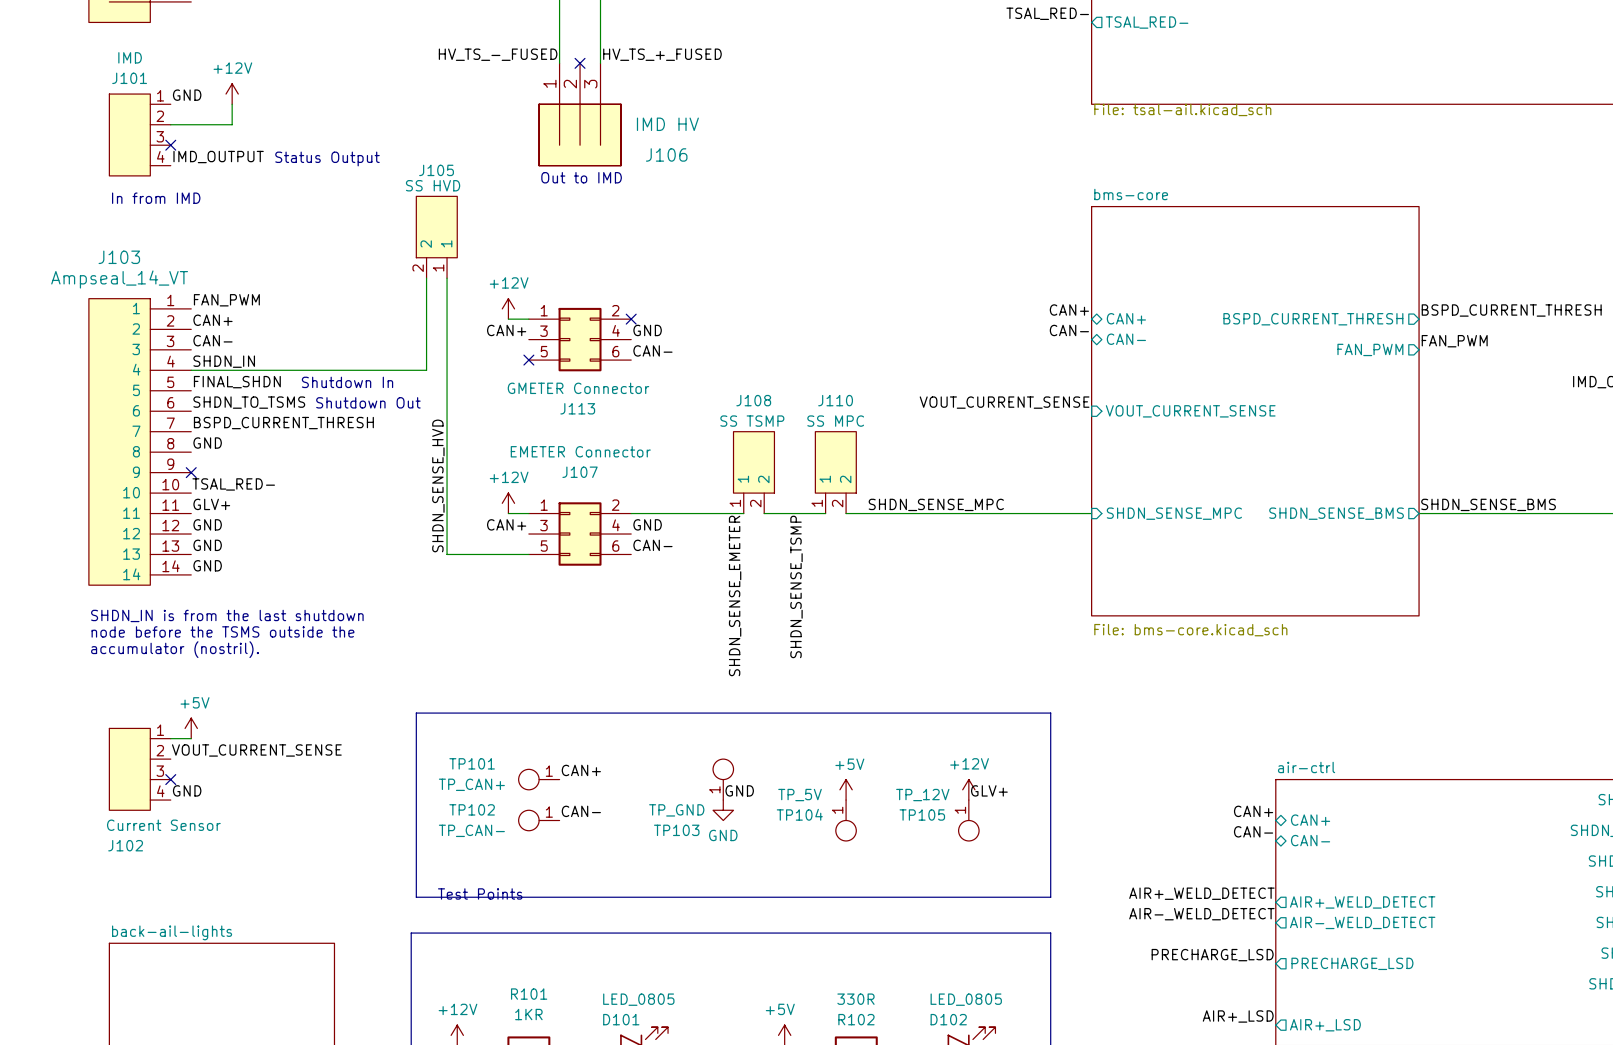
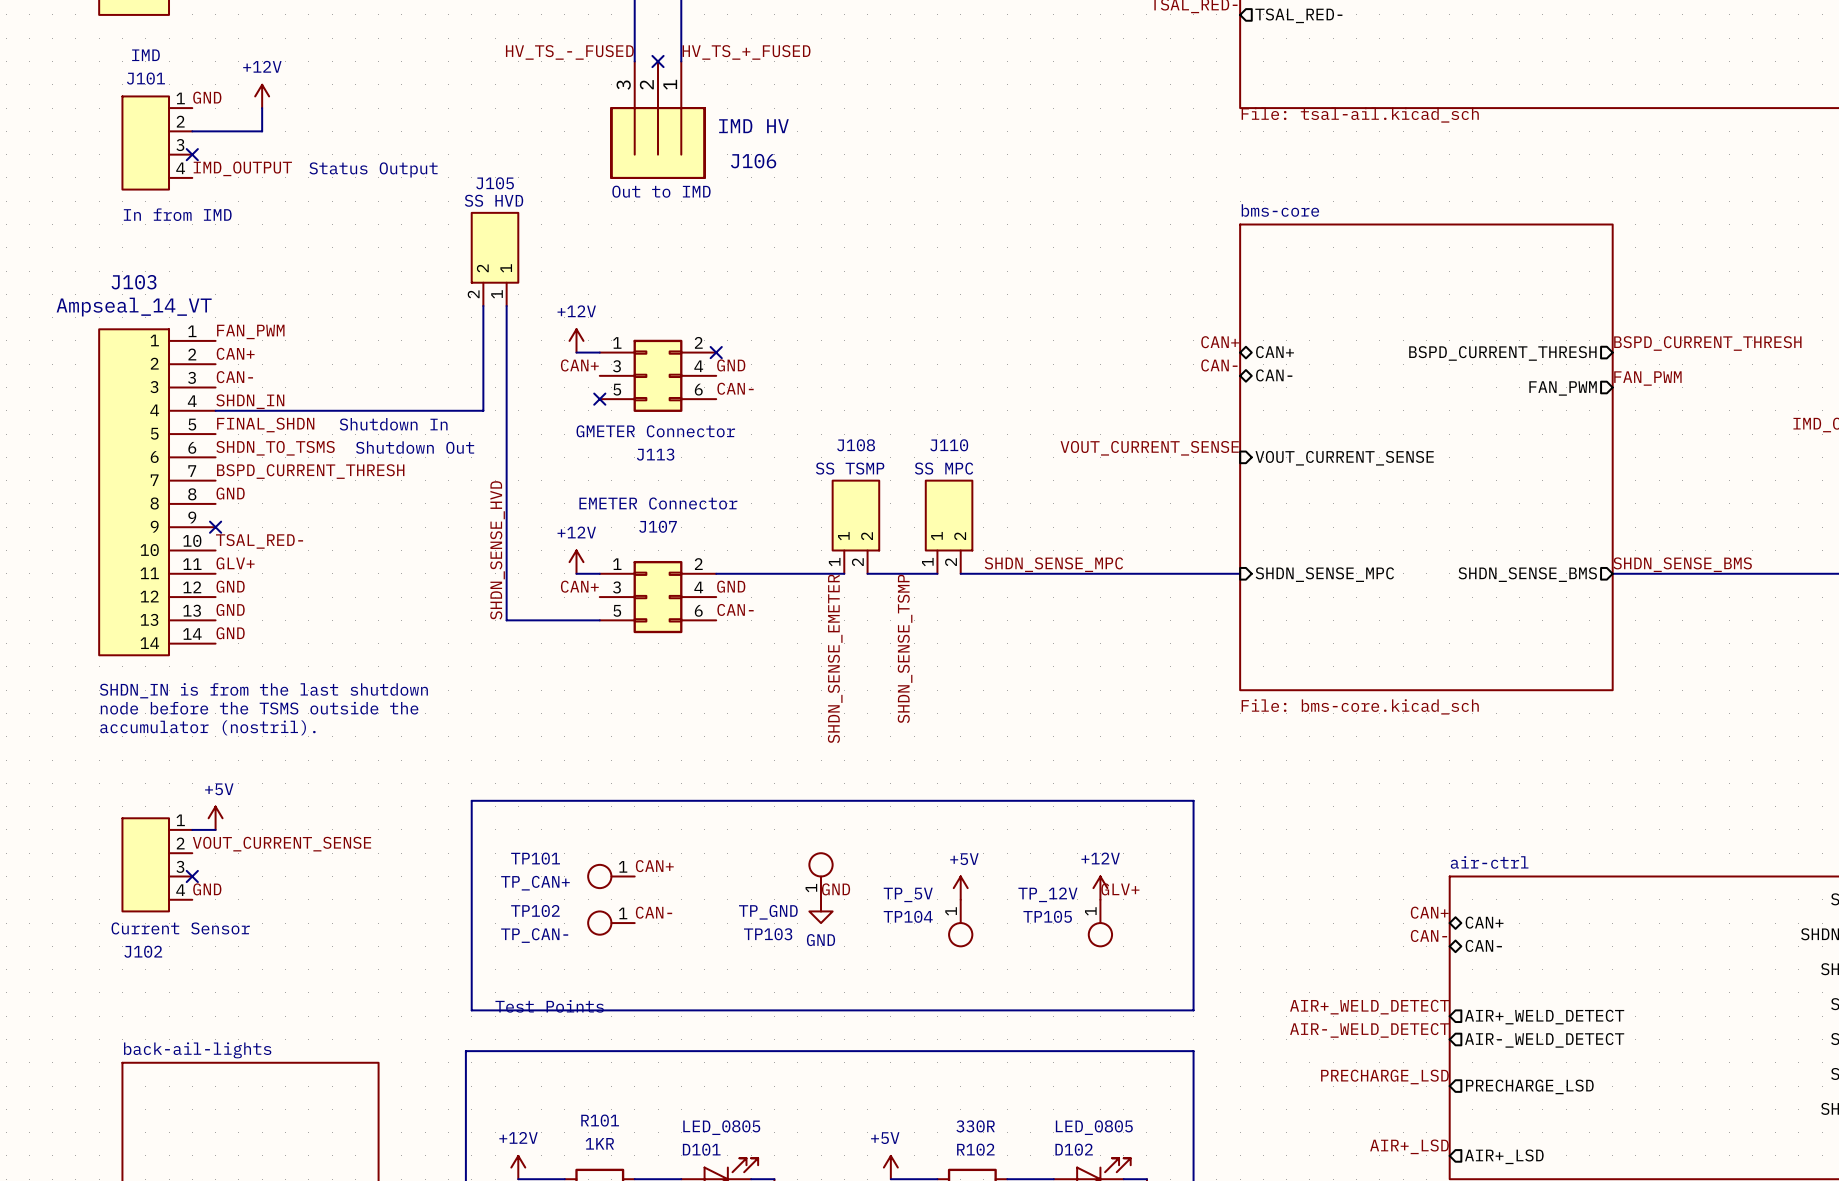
J106 flip: as is (580, 134) -> left-right (658, 143)

